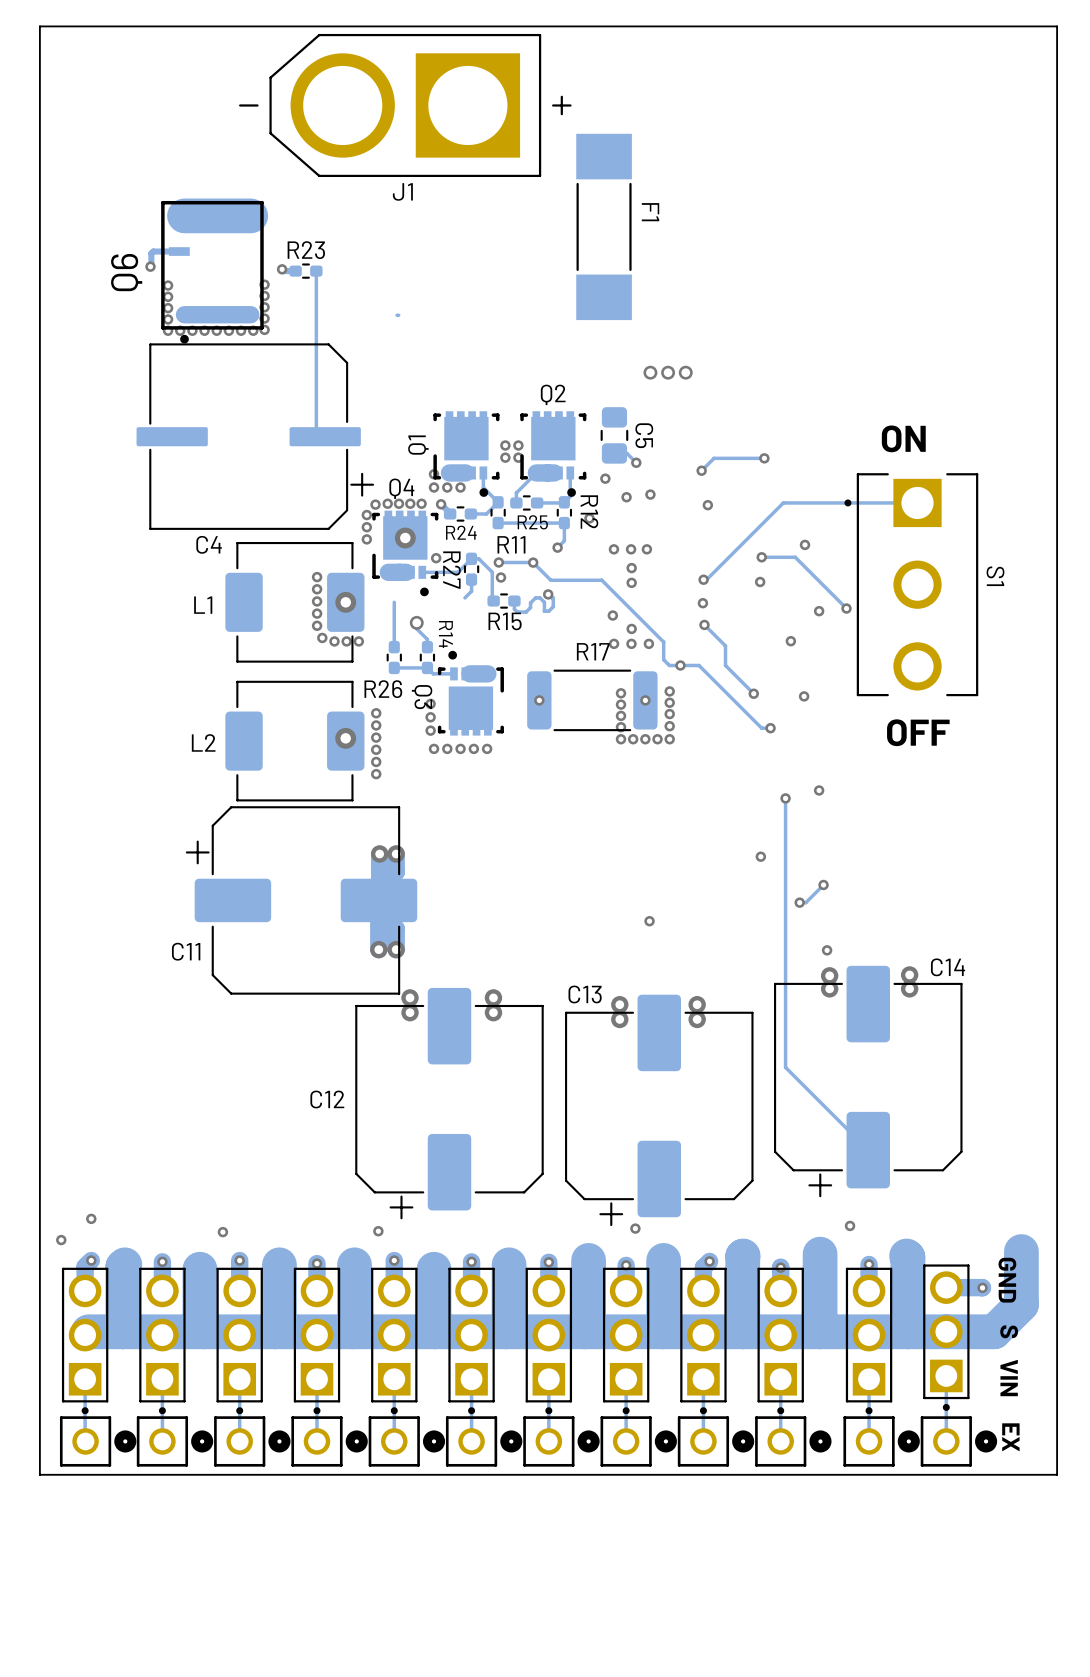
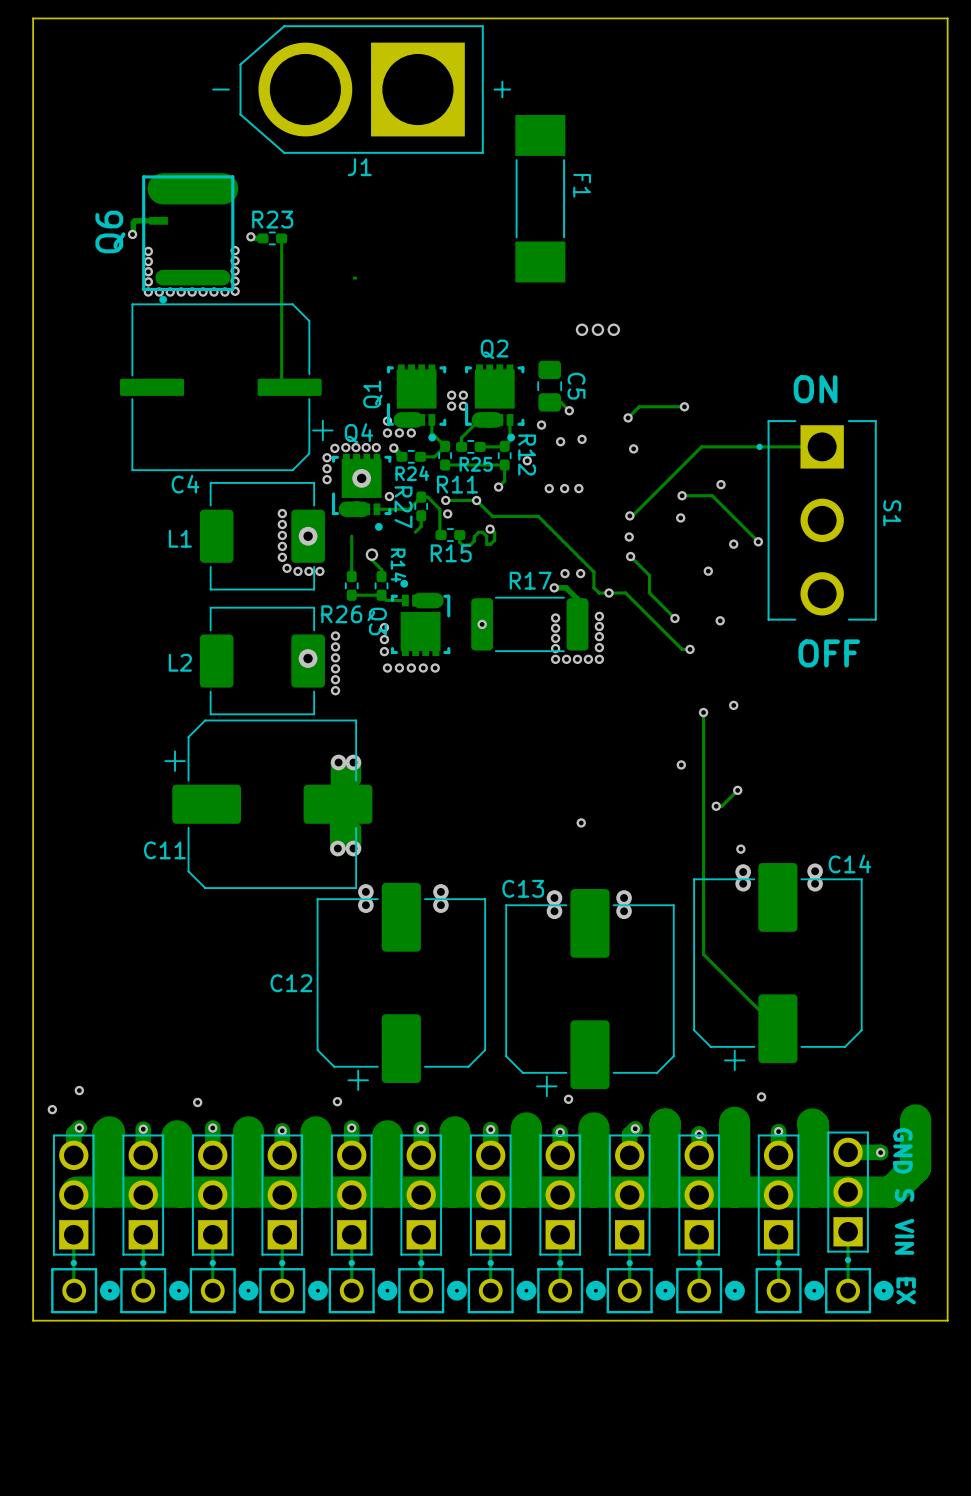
via: (631, 568) -> none
via: (631, 582) -> none
via: (612, 615) -> none
via: (631, 628) -> none
via: (614, 643) -> none
track: none -> (554, 587) (566, 587) (577, 599) (577, 624)
via: none -> (554, 587)
via: (645, 700) -> none

